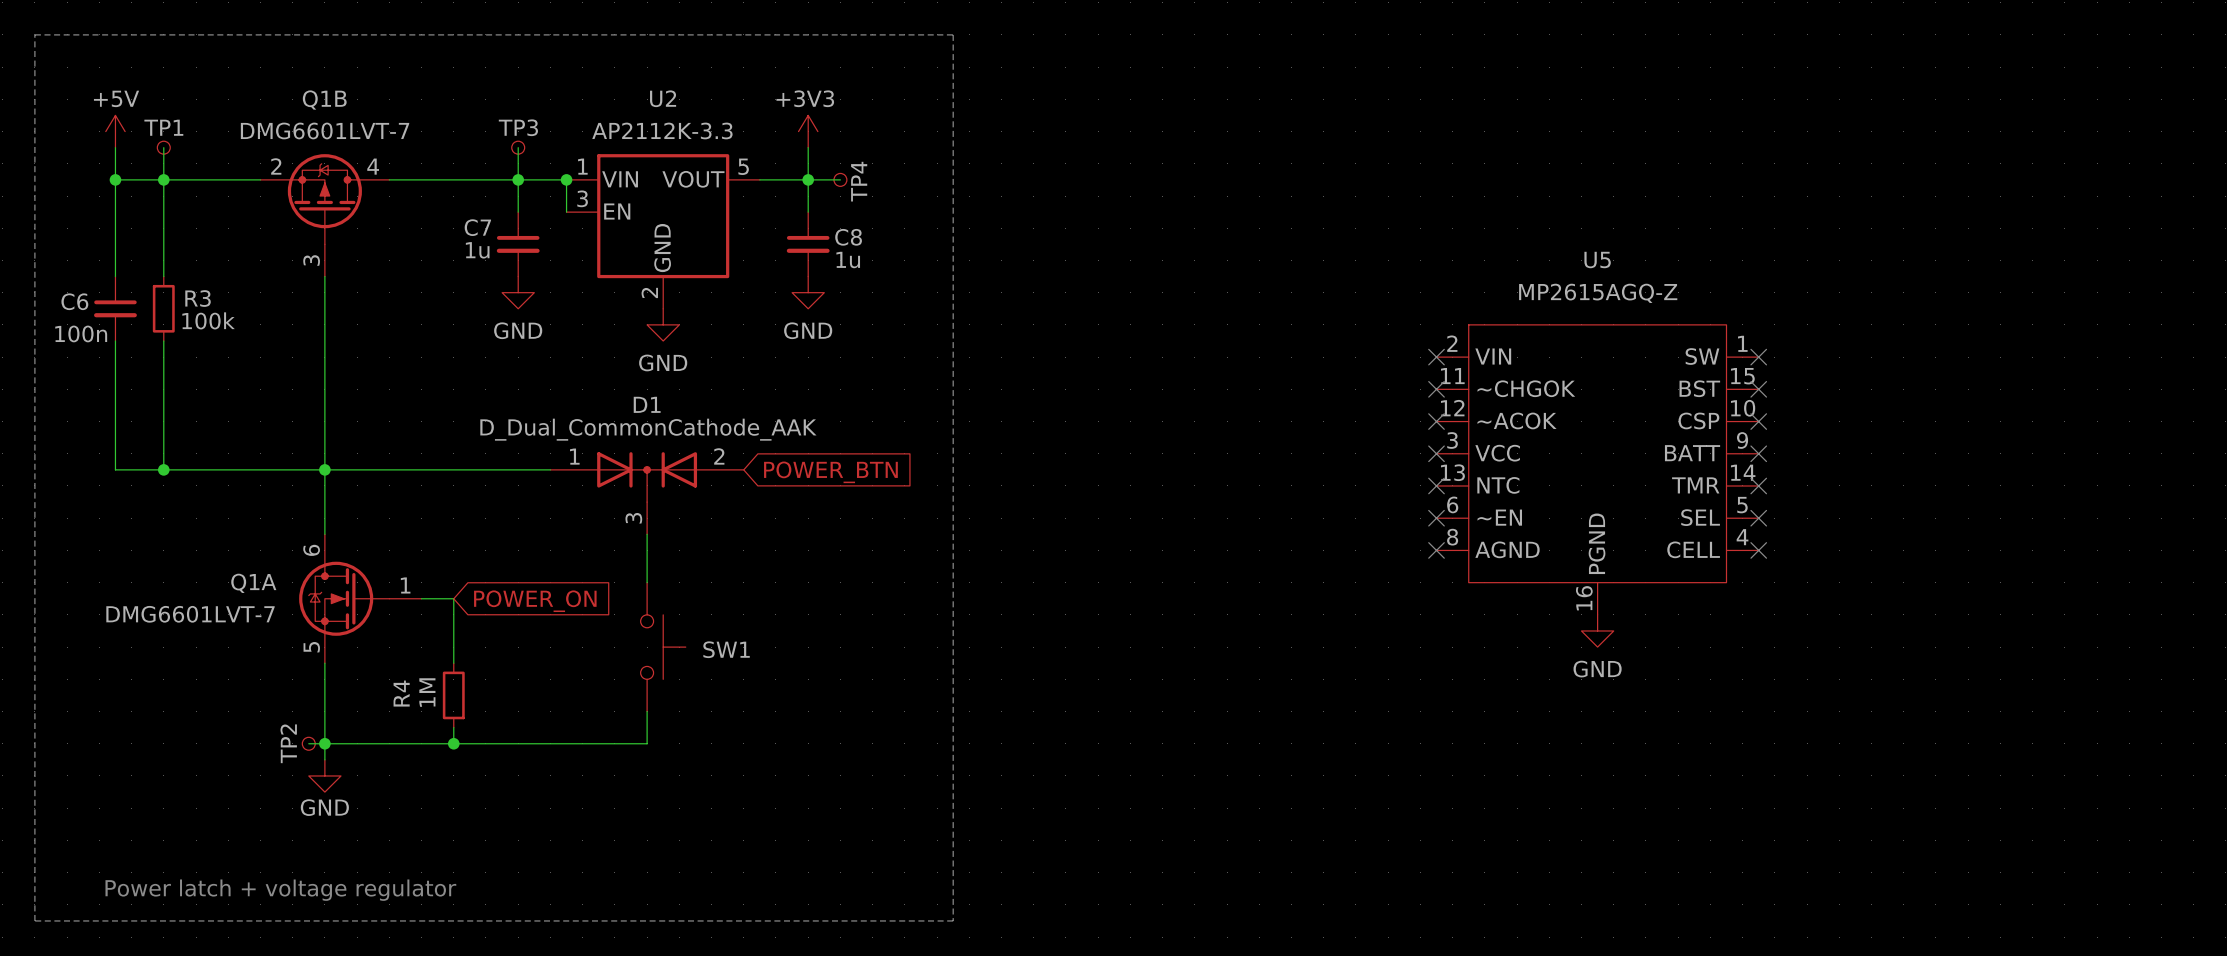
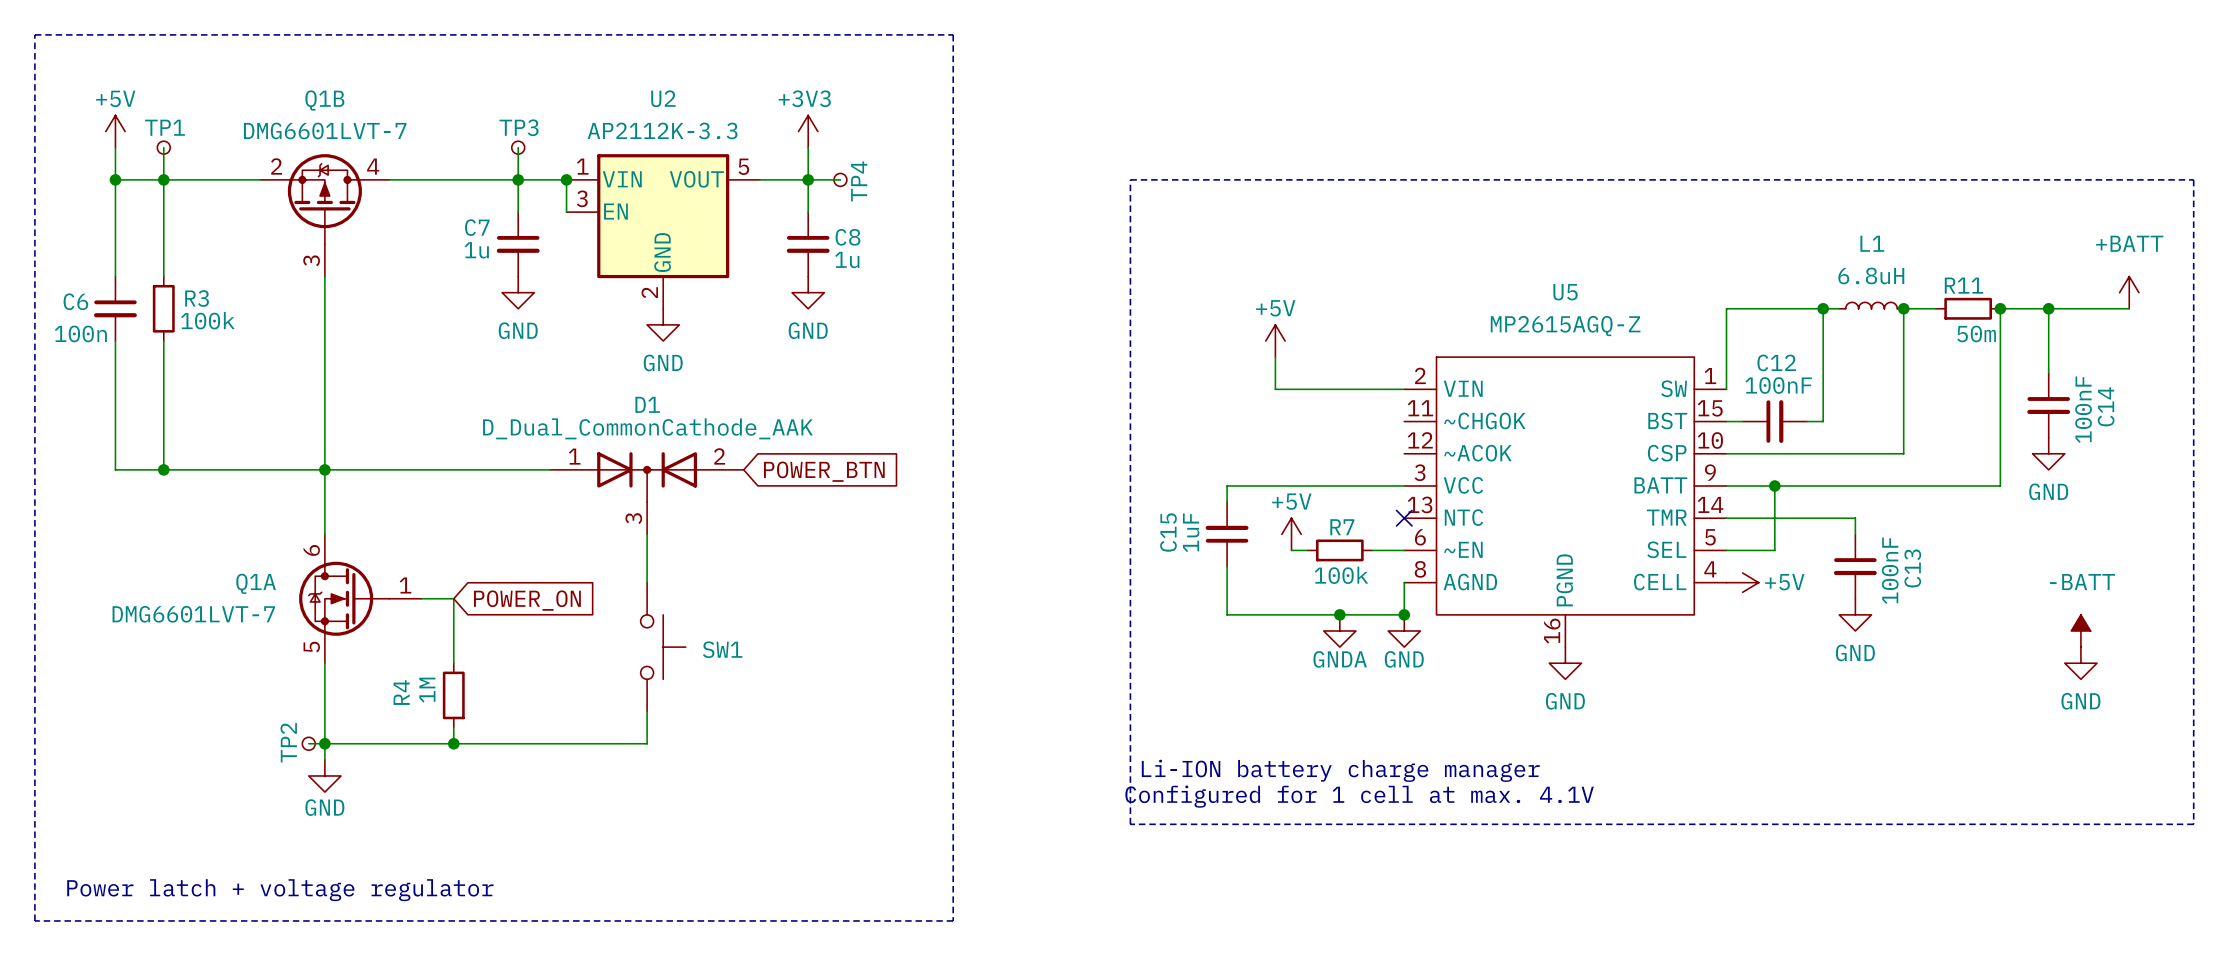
line: none -> (1130, 179) (2193, 179) (2193, 824) (1130, 824) (1130, 179)
power symbol: none -> +BATT (2129, 292)
L1: none -> 6.8uH (1871, 305)
wire: none -> (1823, 308) (1823, 421) (1807, 421)
junction: none -> (1823, 308)
wire: none -> (1839, 308) (1726, 308) (1726, 389)
junction: none -> (1903, 308)
wire: none -> (1935, 308) (1903, 308) (1903, 453) (1726, 453)
R11: none -> 50m (1968, 308)
junction: none -> (2000, 308)
wire: none -> (2048, 308) (2048, 373)
junction: none -> (2048, 308)
wire: none -> (2129, 308) (2000, 308) (2000, 485) (1726, 485)
power symbol: none -> +5V (1275, 341)
wire: none -> (1275, 357) (1275, 389) (1404, 389)
no-connect mark: (1436, 357) -> none
no-connect mark: (1758, 357) -> none
no-connect mark: (1436, 389) -> none
no-connect mark: (1758, 389) -> none
C14: none -> 100nF (2048, 405)
no-connect mark: (1436, 421) -> none
no-connect mark: (1758, 421) -> none
C12: none -> 100nF (1774, 421)
no-connect mark: (1436, 453) -> none
no-connect mark: (1758, 453) -> none
power symbol: none -> GND (2048, 453)
U5 position: (1597, 469) -> (1565, 502)
wire: none -> (1404, 485) (1227, 485) (1227, 502)
no-connect mark: (1436, 485) -> none
no-connect mark: (1758, 485) -> none
wire: none -> (1774, 485) (1774, 550) (1726, 550)
junction: none -> (1774, 485)
no-connect mark: none -> (1404, 518)
no-connect mark: (1436, 518) -> none
wire: none -> (1726, 518) (1855, 518) (1855, 534)
no-connect mark: (1758, 518) -> none
C15: none -> 1uF (1227, 534)
power symbol: none -> +5V (1291, 534)
wire: none -> (1291, 550) (1307, 550)
R7: none -> 100k (1339, 550)
wire: none -> (1372, 550) (1404, 550)
no-connect mark: (1436, 550) -> none
no-connect mark: (1758, 550) -> none
wire: none -> (1227, 566) (1227, 614) (1404, 614) (1404, 582)
C13: none -> 100nF (1855, 566)
power symbol: none -> +5V (1742, 582)
junction: none -> (1339, 614)
junction: none -> (1404, 614)
power symbol: none -> GND (1855, 614)
power symbol: none -> GNDA (1339, 630)
power symbol: none -> GND (1404, 630)
power symbol position: GND (1597, 630) -> GND (1565, 663)
power symbol: none -> -BATT (2080, 630)
power symbol: none -> GND (2080, 663)
text: none -> Li-ION battery charge manager (1340, 770)
text: none -> Configured for 1 cell at max. 4.1V (1359, 796)

